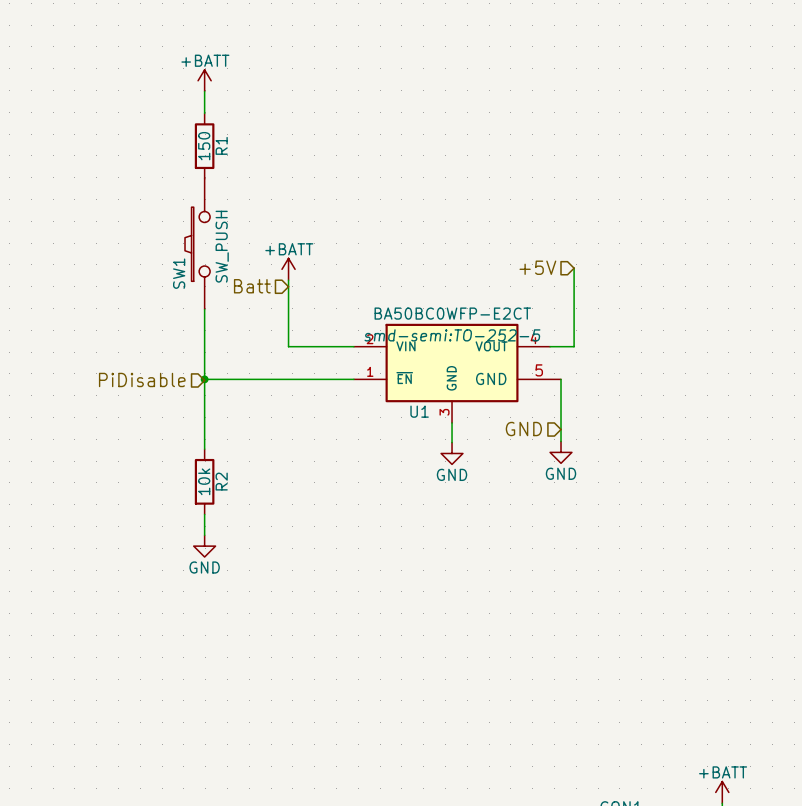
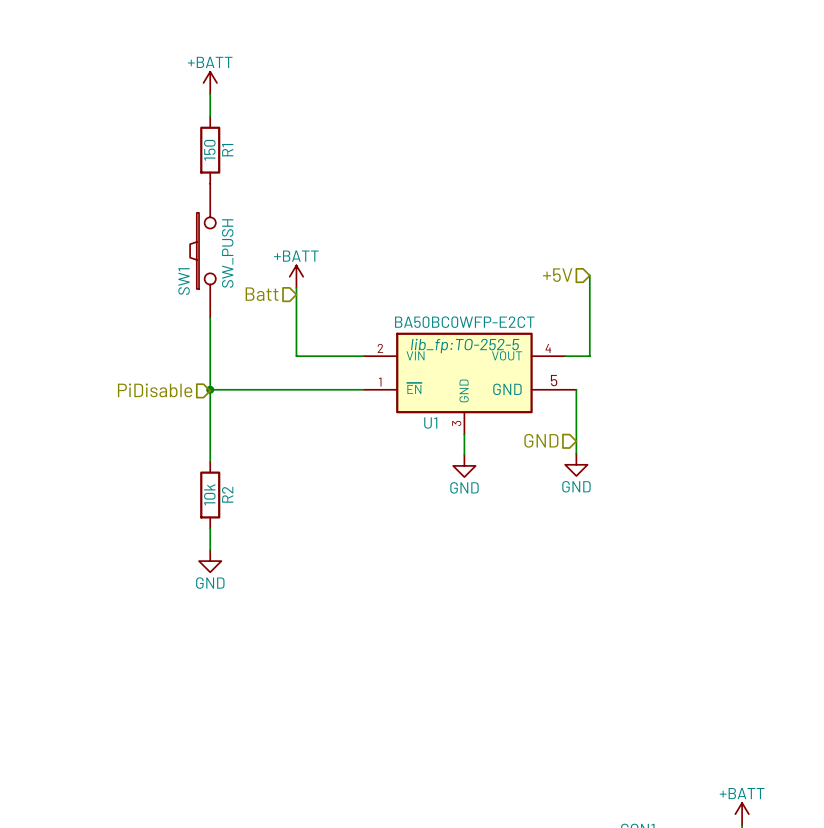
U1 text: smd-semi:TO-252-5 (452, 335) -> lib_fp:TO-252-5 (465, 346)

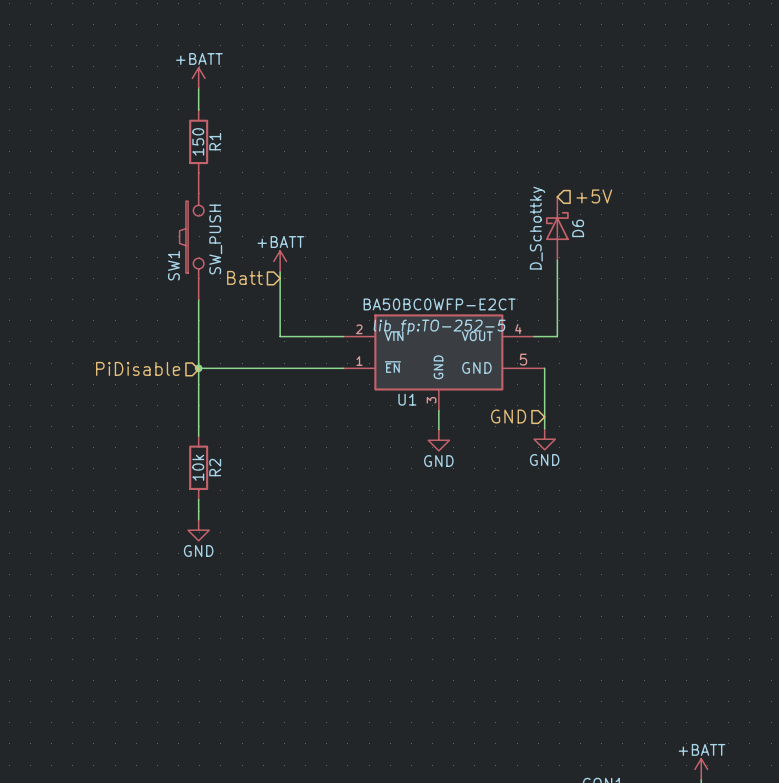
D6: none -> D_Schottky (557, 228)
hierarchical label rotation: 0° (557, 275) -> 180° (594, 196)
hierarchical label position: +5V (557, 275) -> +5V (594, 196)

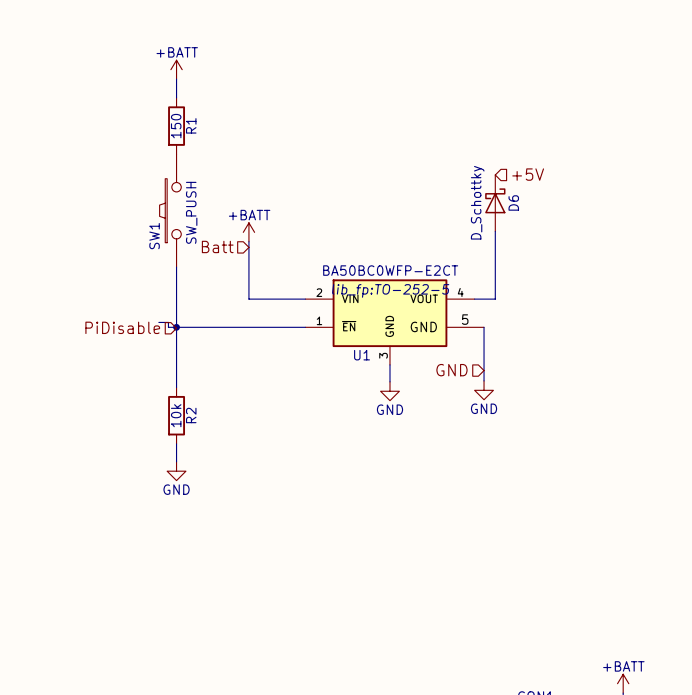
wire: none -> (158, 322) (168, 322) (168, 327) (176, 327)

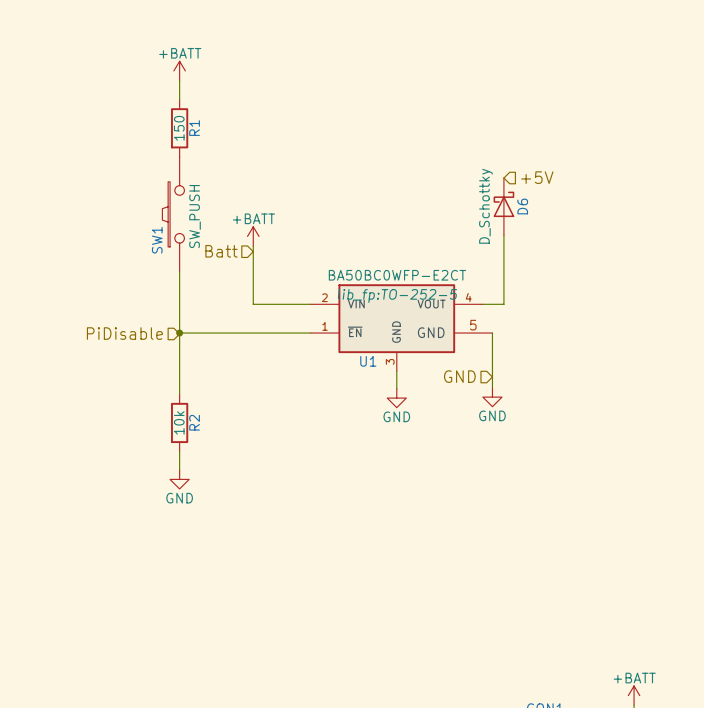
wire: (158, 322) (168, 322) (168, 327) (176, 327) -> none

